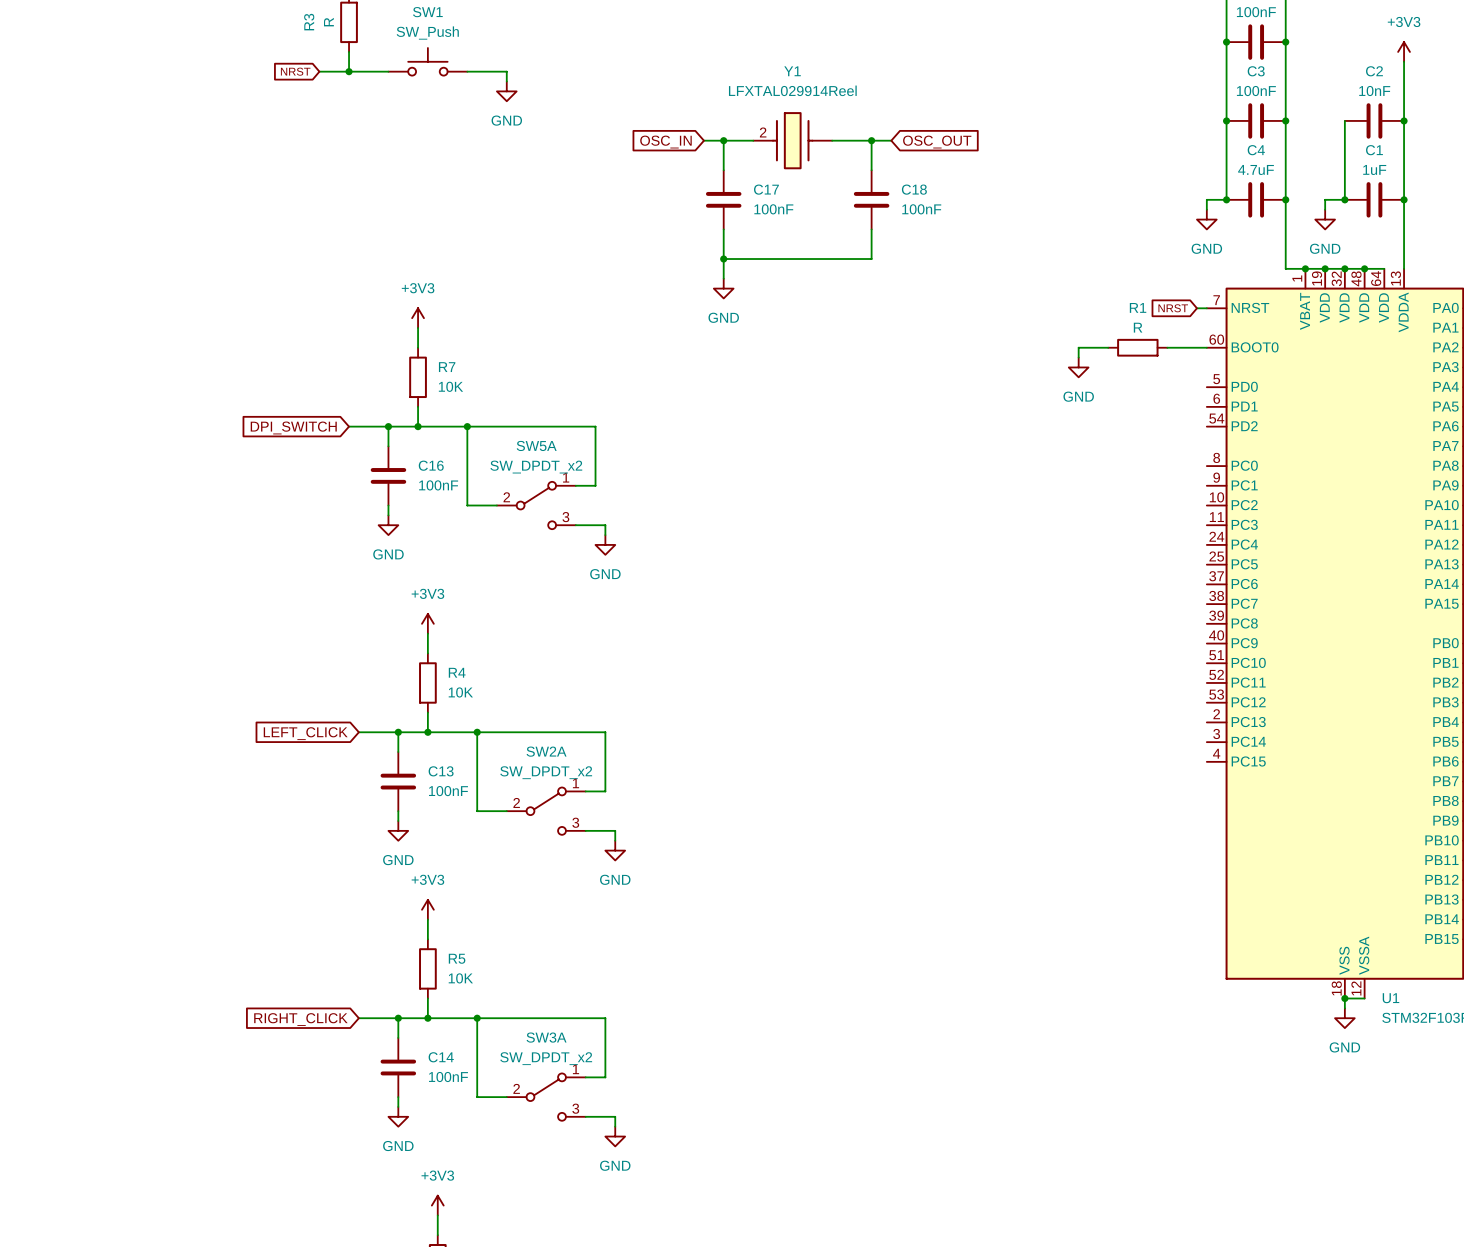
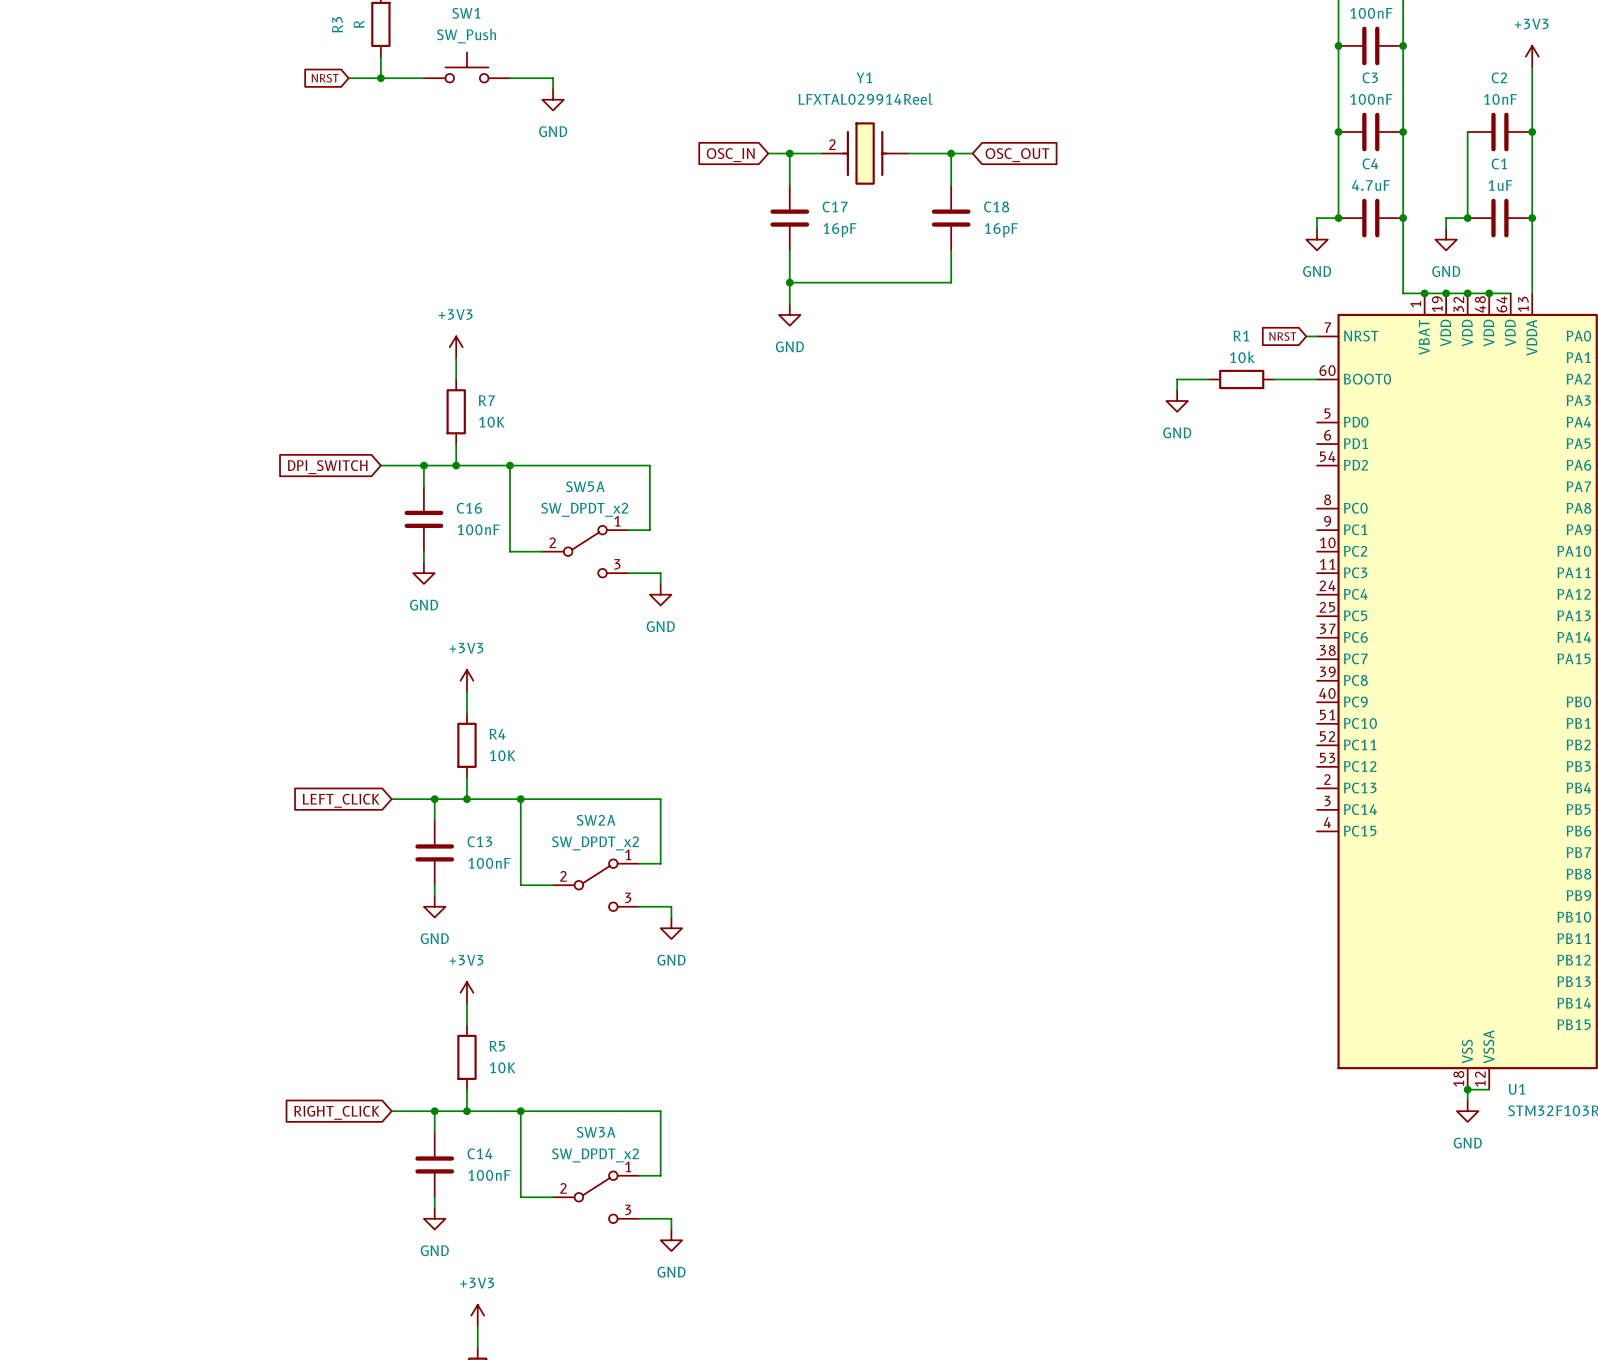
C17 value: 100nF (773, 209) -> 16pF (839, 230)
C18 value: 100nF (921, 209) -> 16pF (1001, 230)
R1 value: R (1138, 327) -> 10k (1242, 357)

